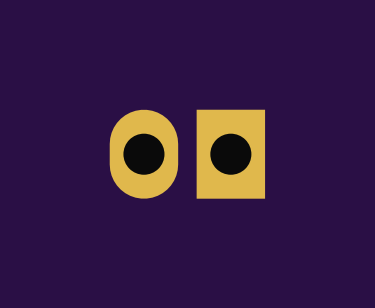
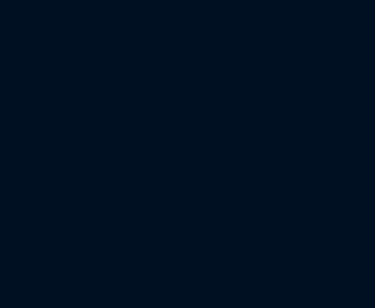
part: (187, 154) -> none

